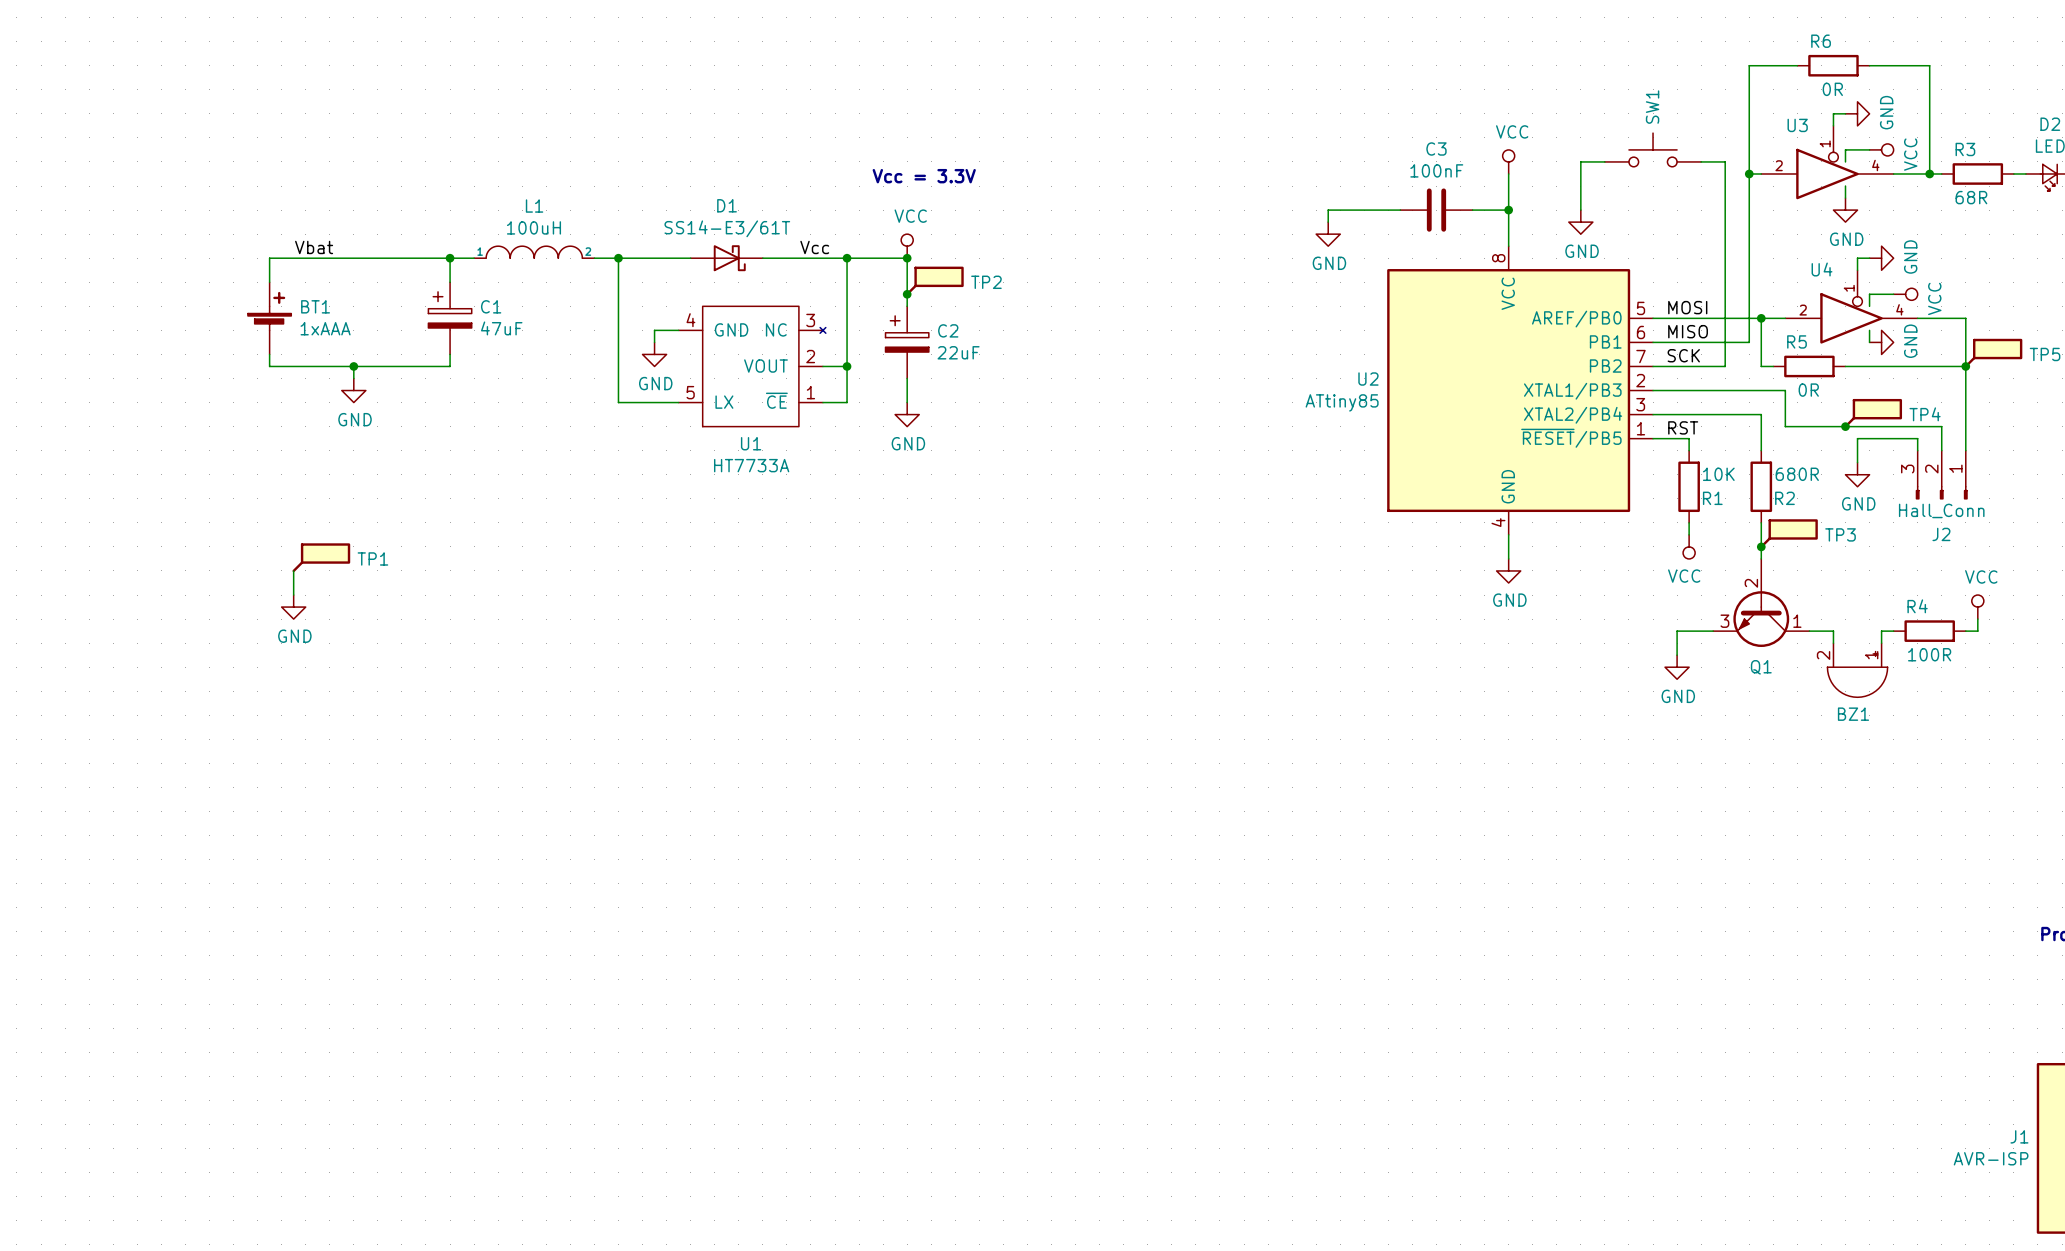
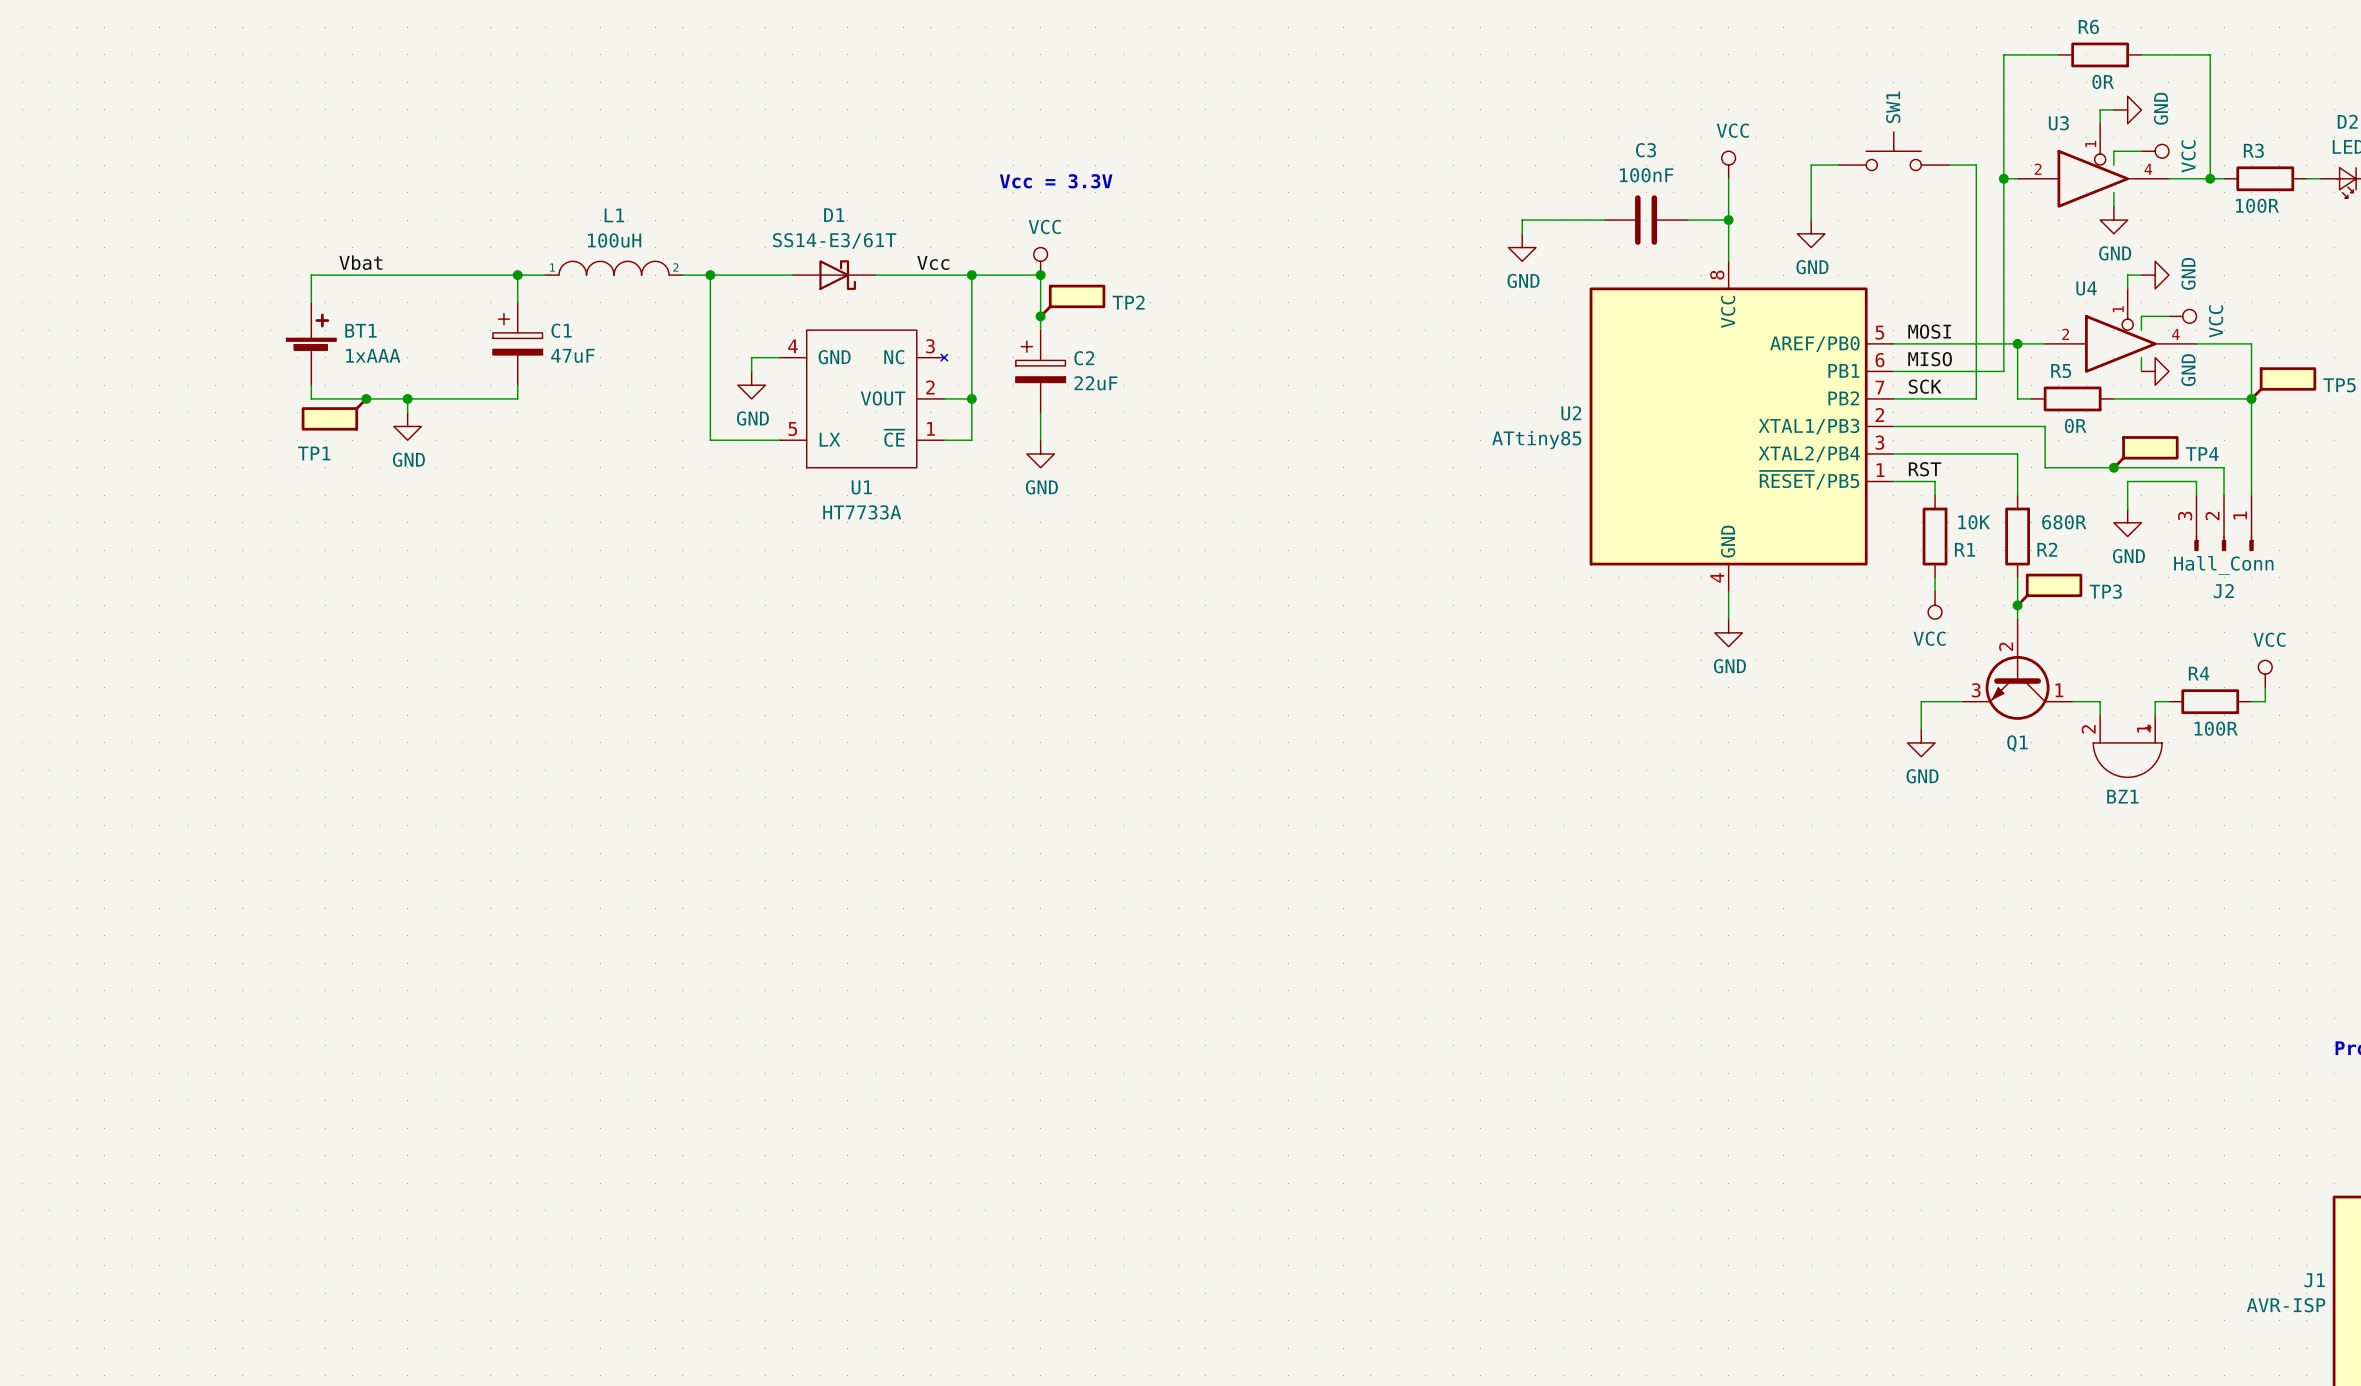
R3 value: 68R (1971, 197) -> 100R (2257, 205)
junction: none -> (366, 398)
TP1 rotation: 0° (321, 557) -> 180° (334, 414)
TP1 position: (321, 557) -> (334, 414)
TP1 name position: TP1 (372, 558) -> TP1 (314, 453)
wire: (293, 570) (293, 595) -> none
power symbol: GND (293, 607) -> none

